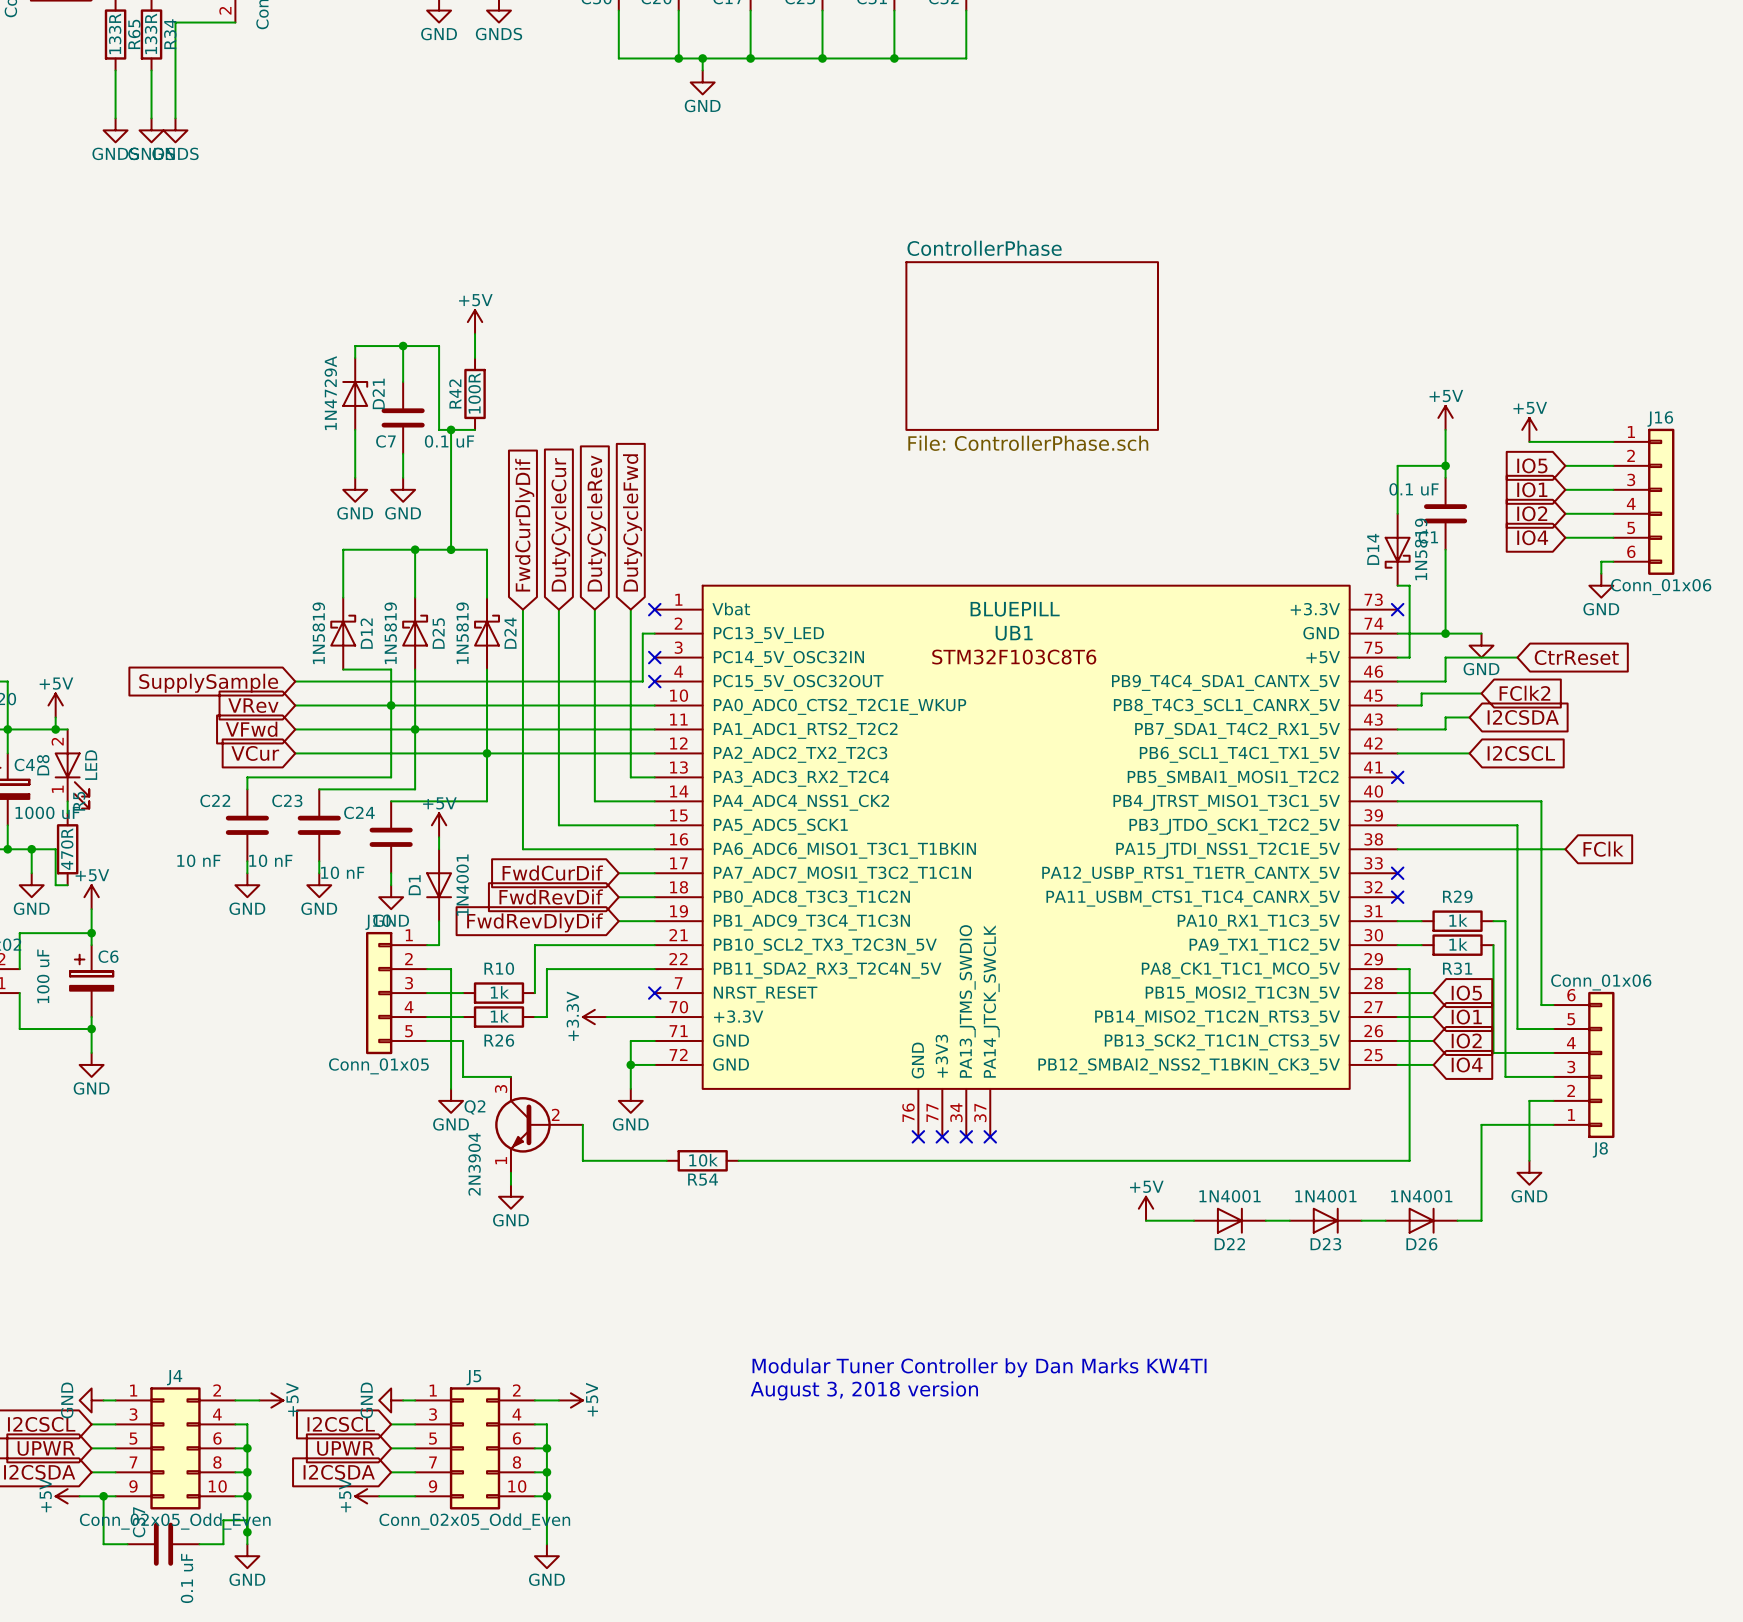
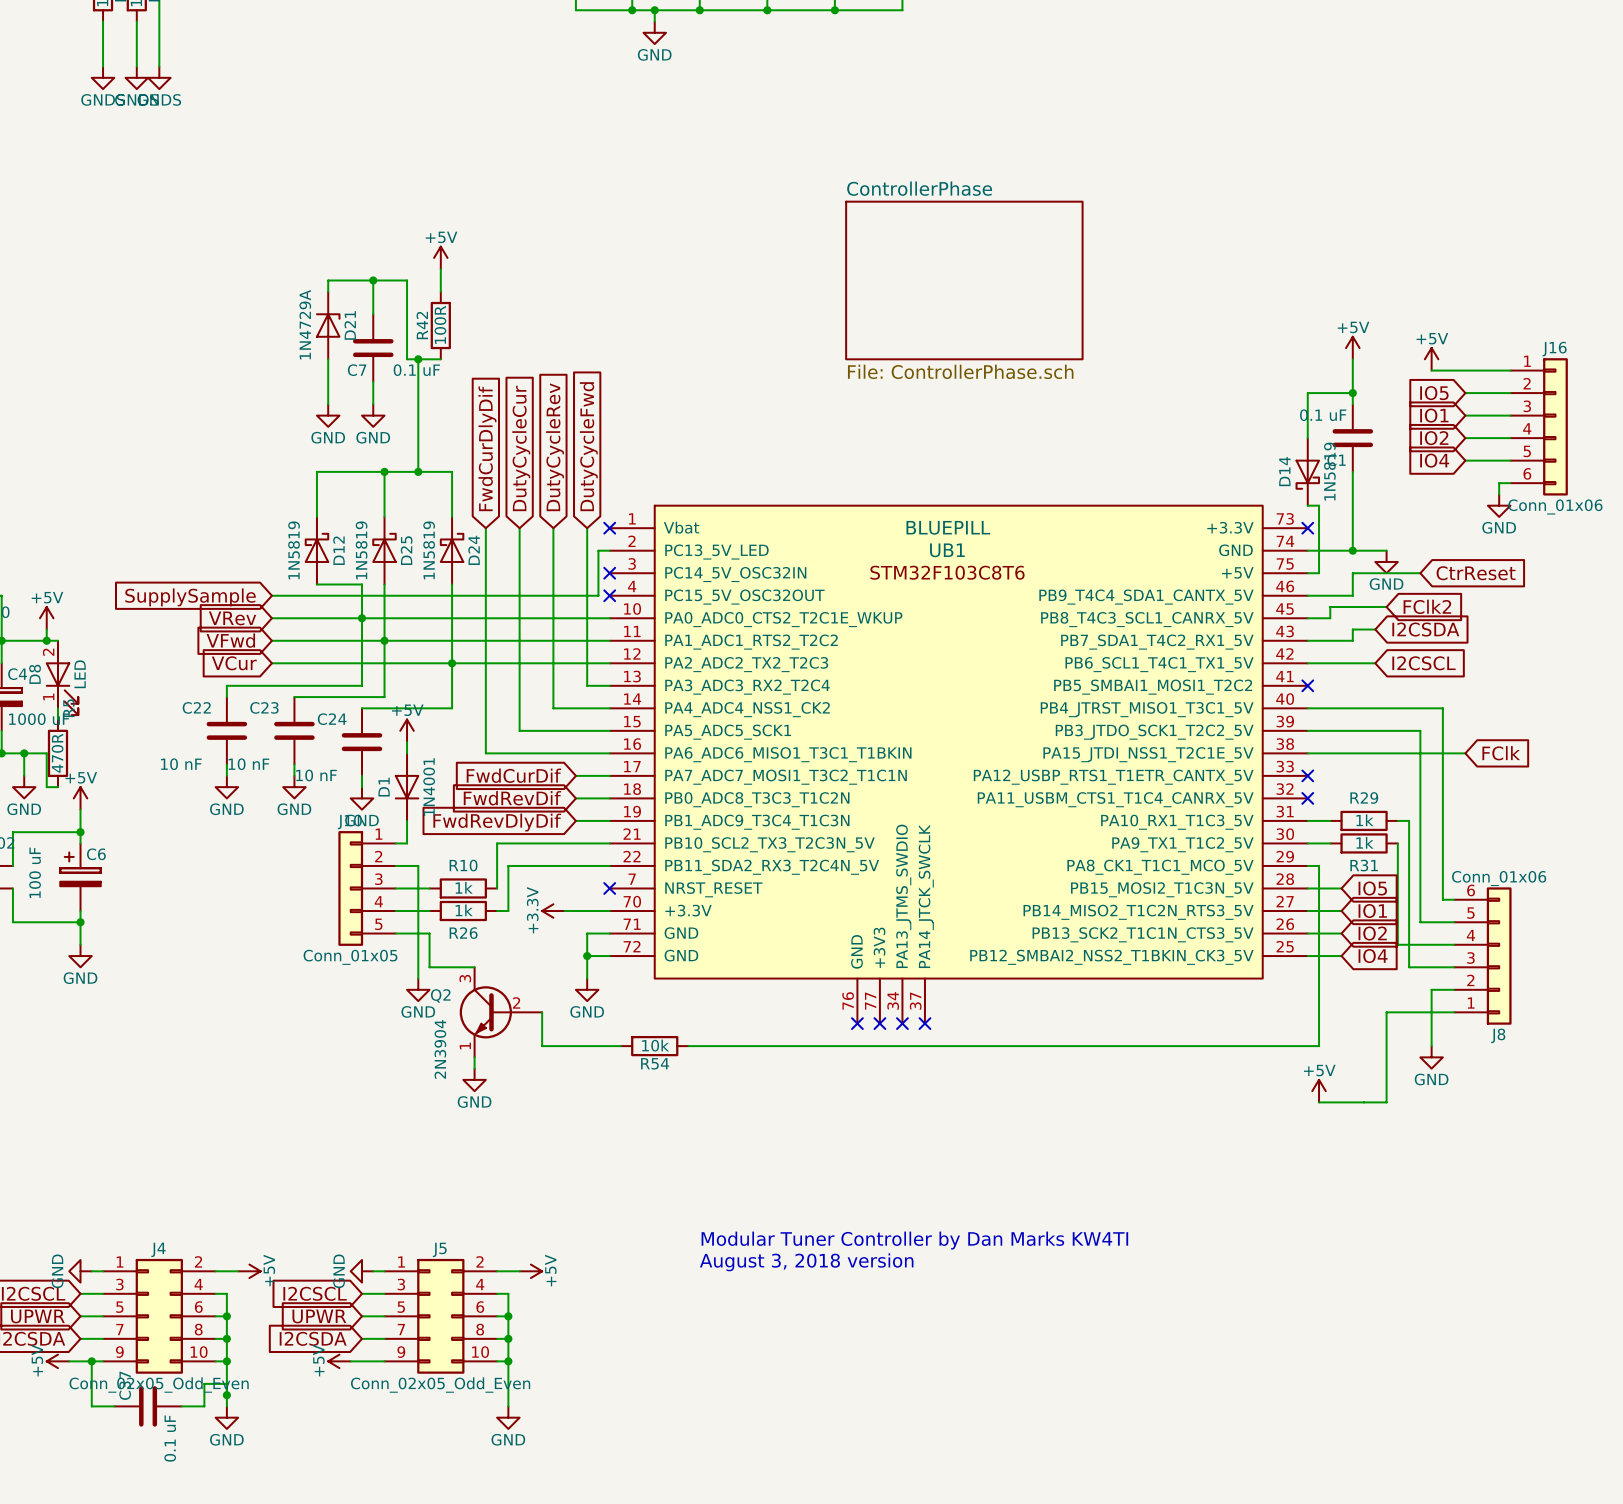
power symbol: +5V (1146, 1208) -> none
power symbol: none -> +5V (1319, 1091)
wire: (1146, 1220) (1193, 1220) -> none
D22: 1N4001 (1229, 1220) -> none
wire: (1265, 1220) (1289, 1220) -> none
D23: 1N4001 (1325, 1220) -> none
wire: (1361, 1220) (1385, 1220) -> none
D26: 1N4001 (1421, 1220) -> none

